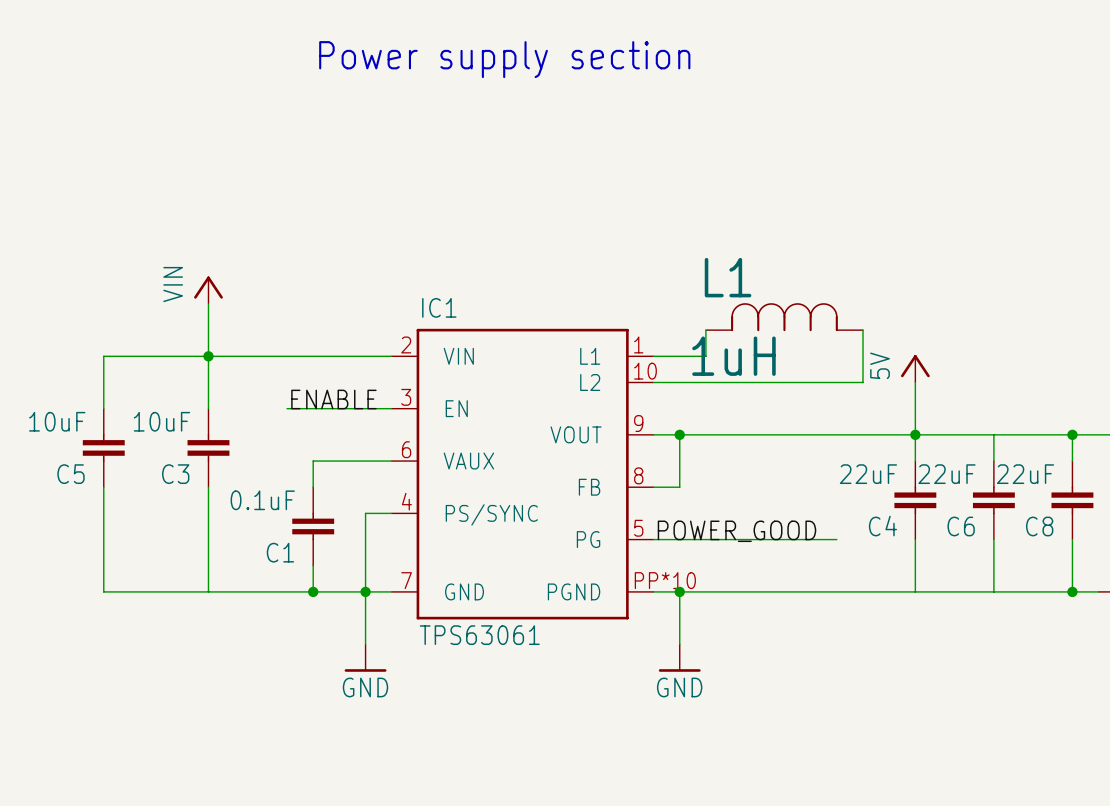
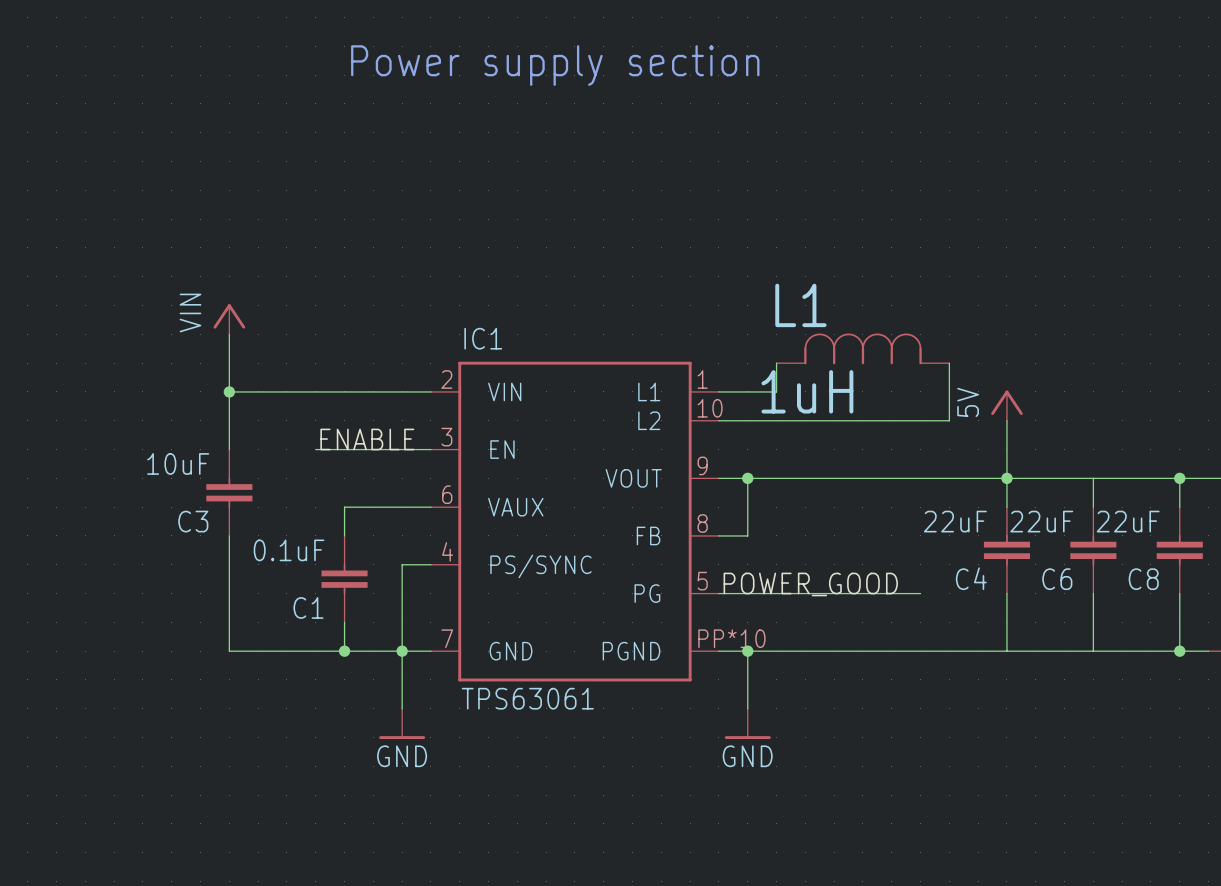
wire: (208, 356) (103, 356) (103, 408) -> none
C5: 10uF (103, 447) -> none
wire: (103, 487) (103, 591) (208, 591) -> none

